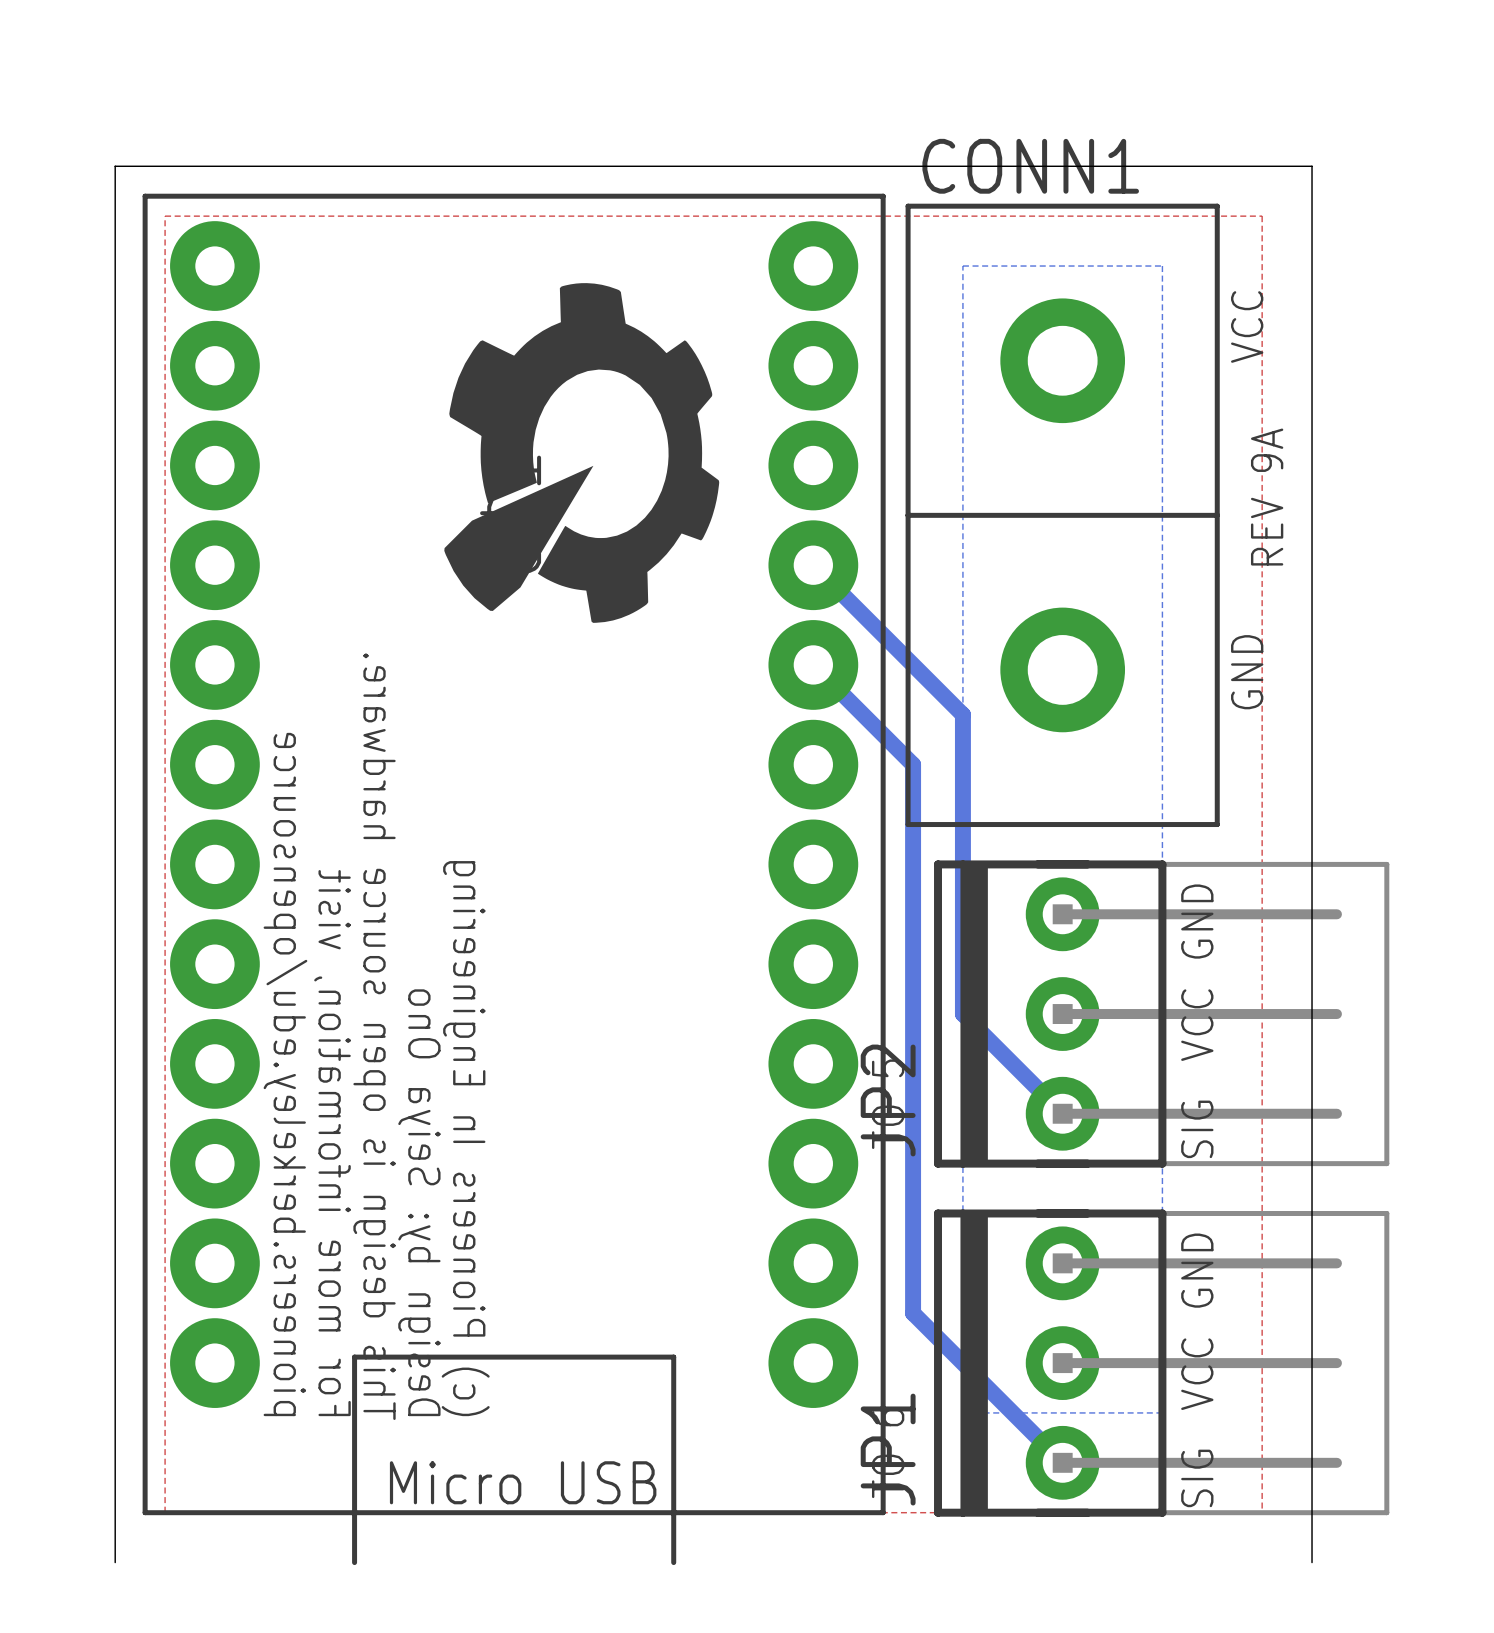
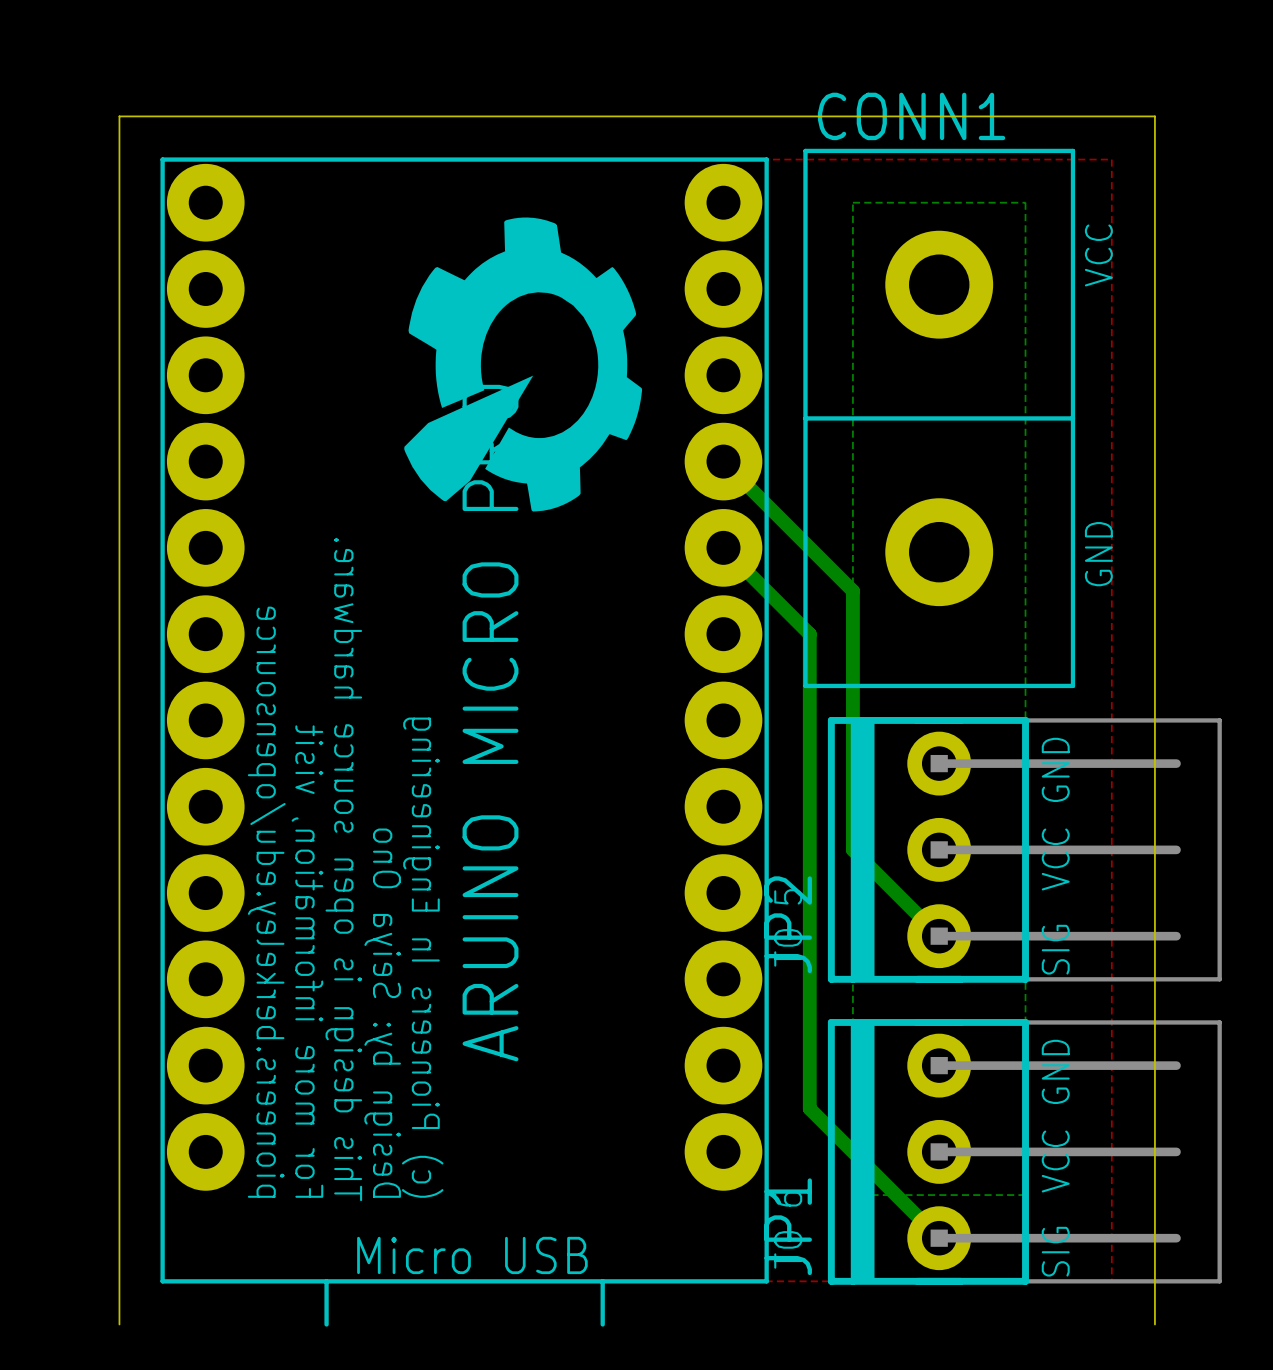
text: REV 9A (1267, 497) -> none
part: (514, 879) -> none
part: none -> (464, 742)

